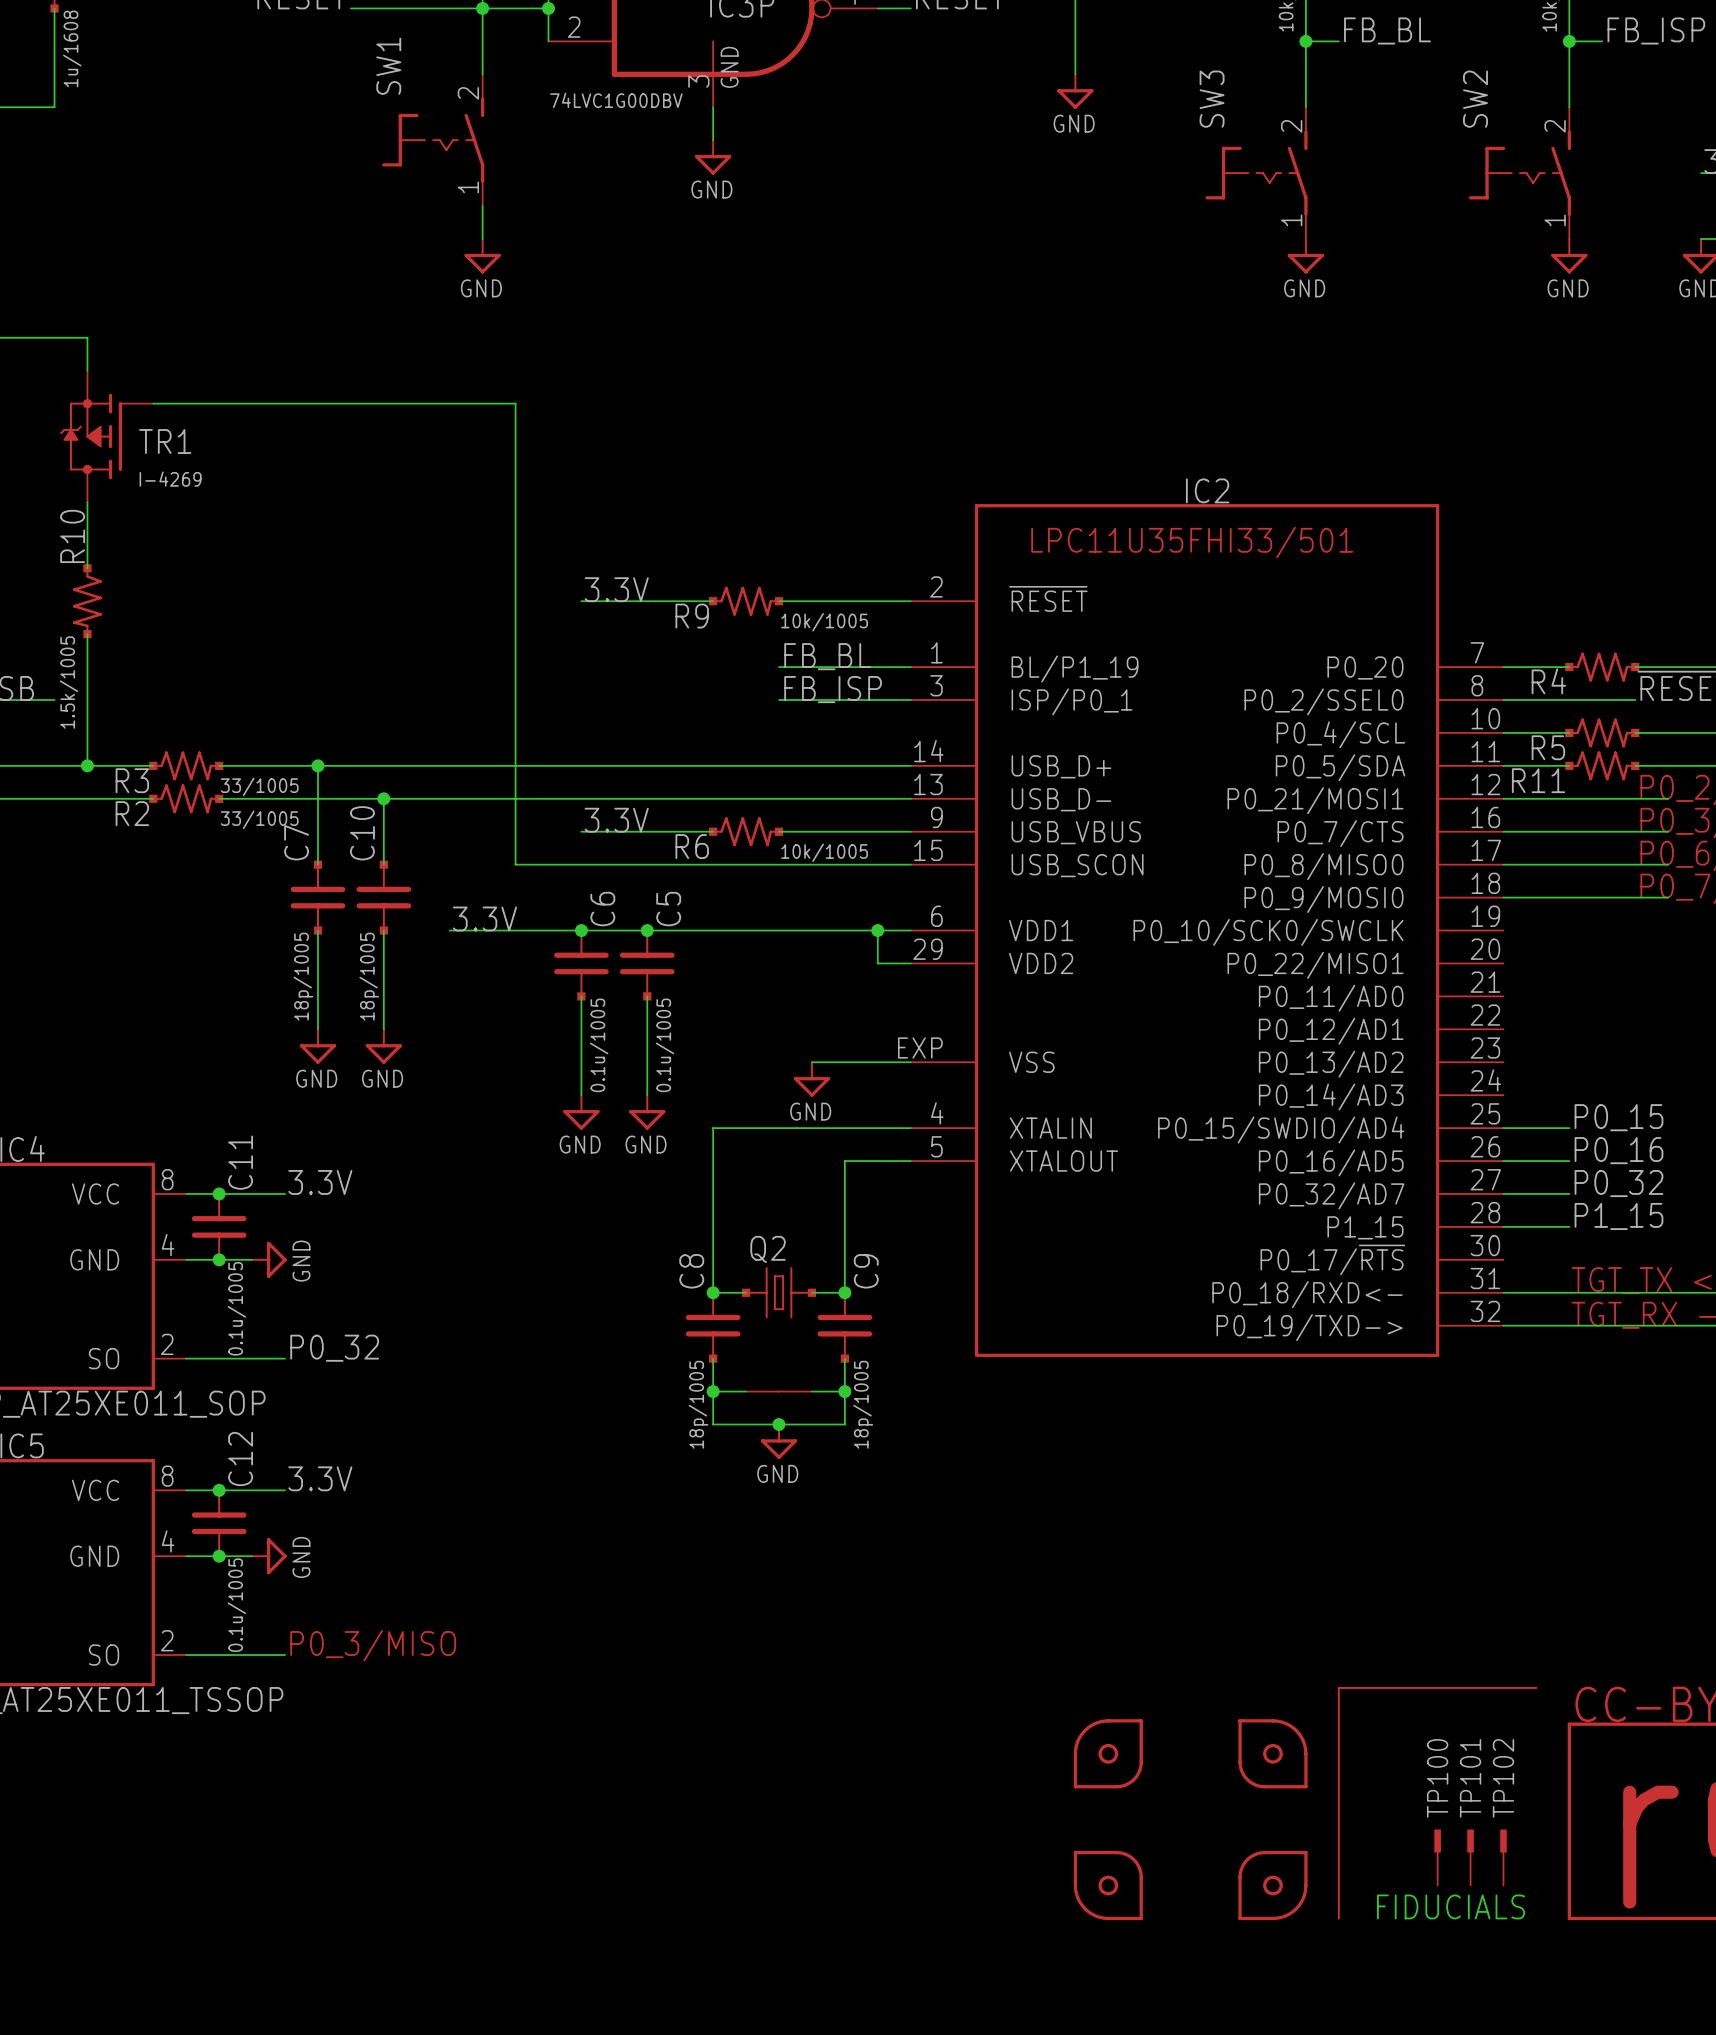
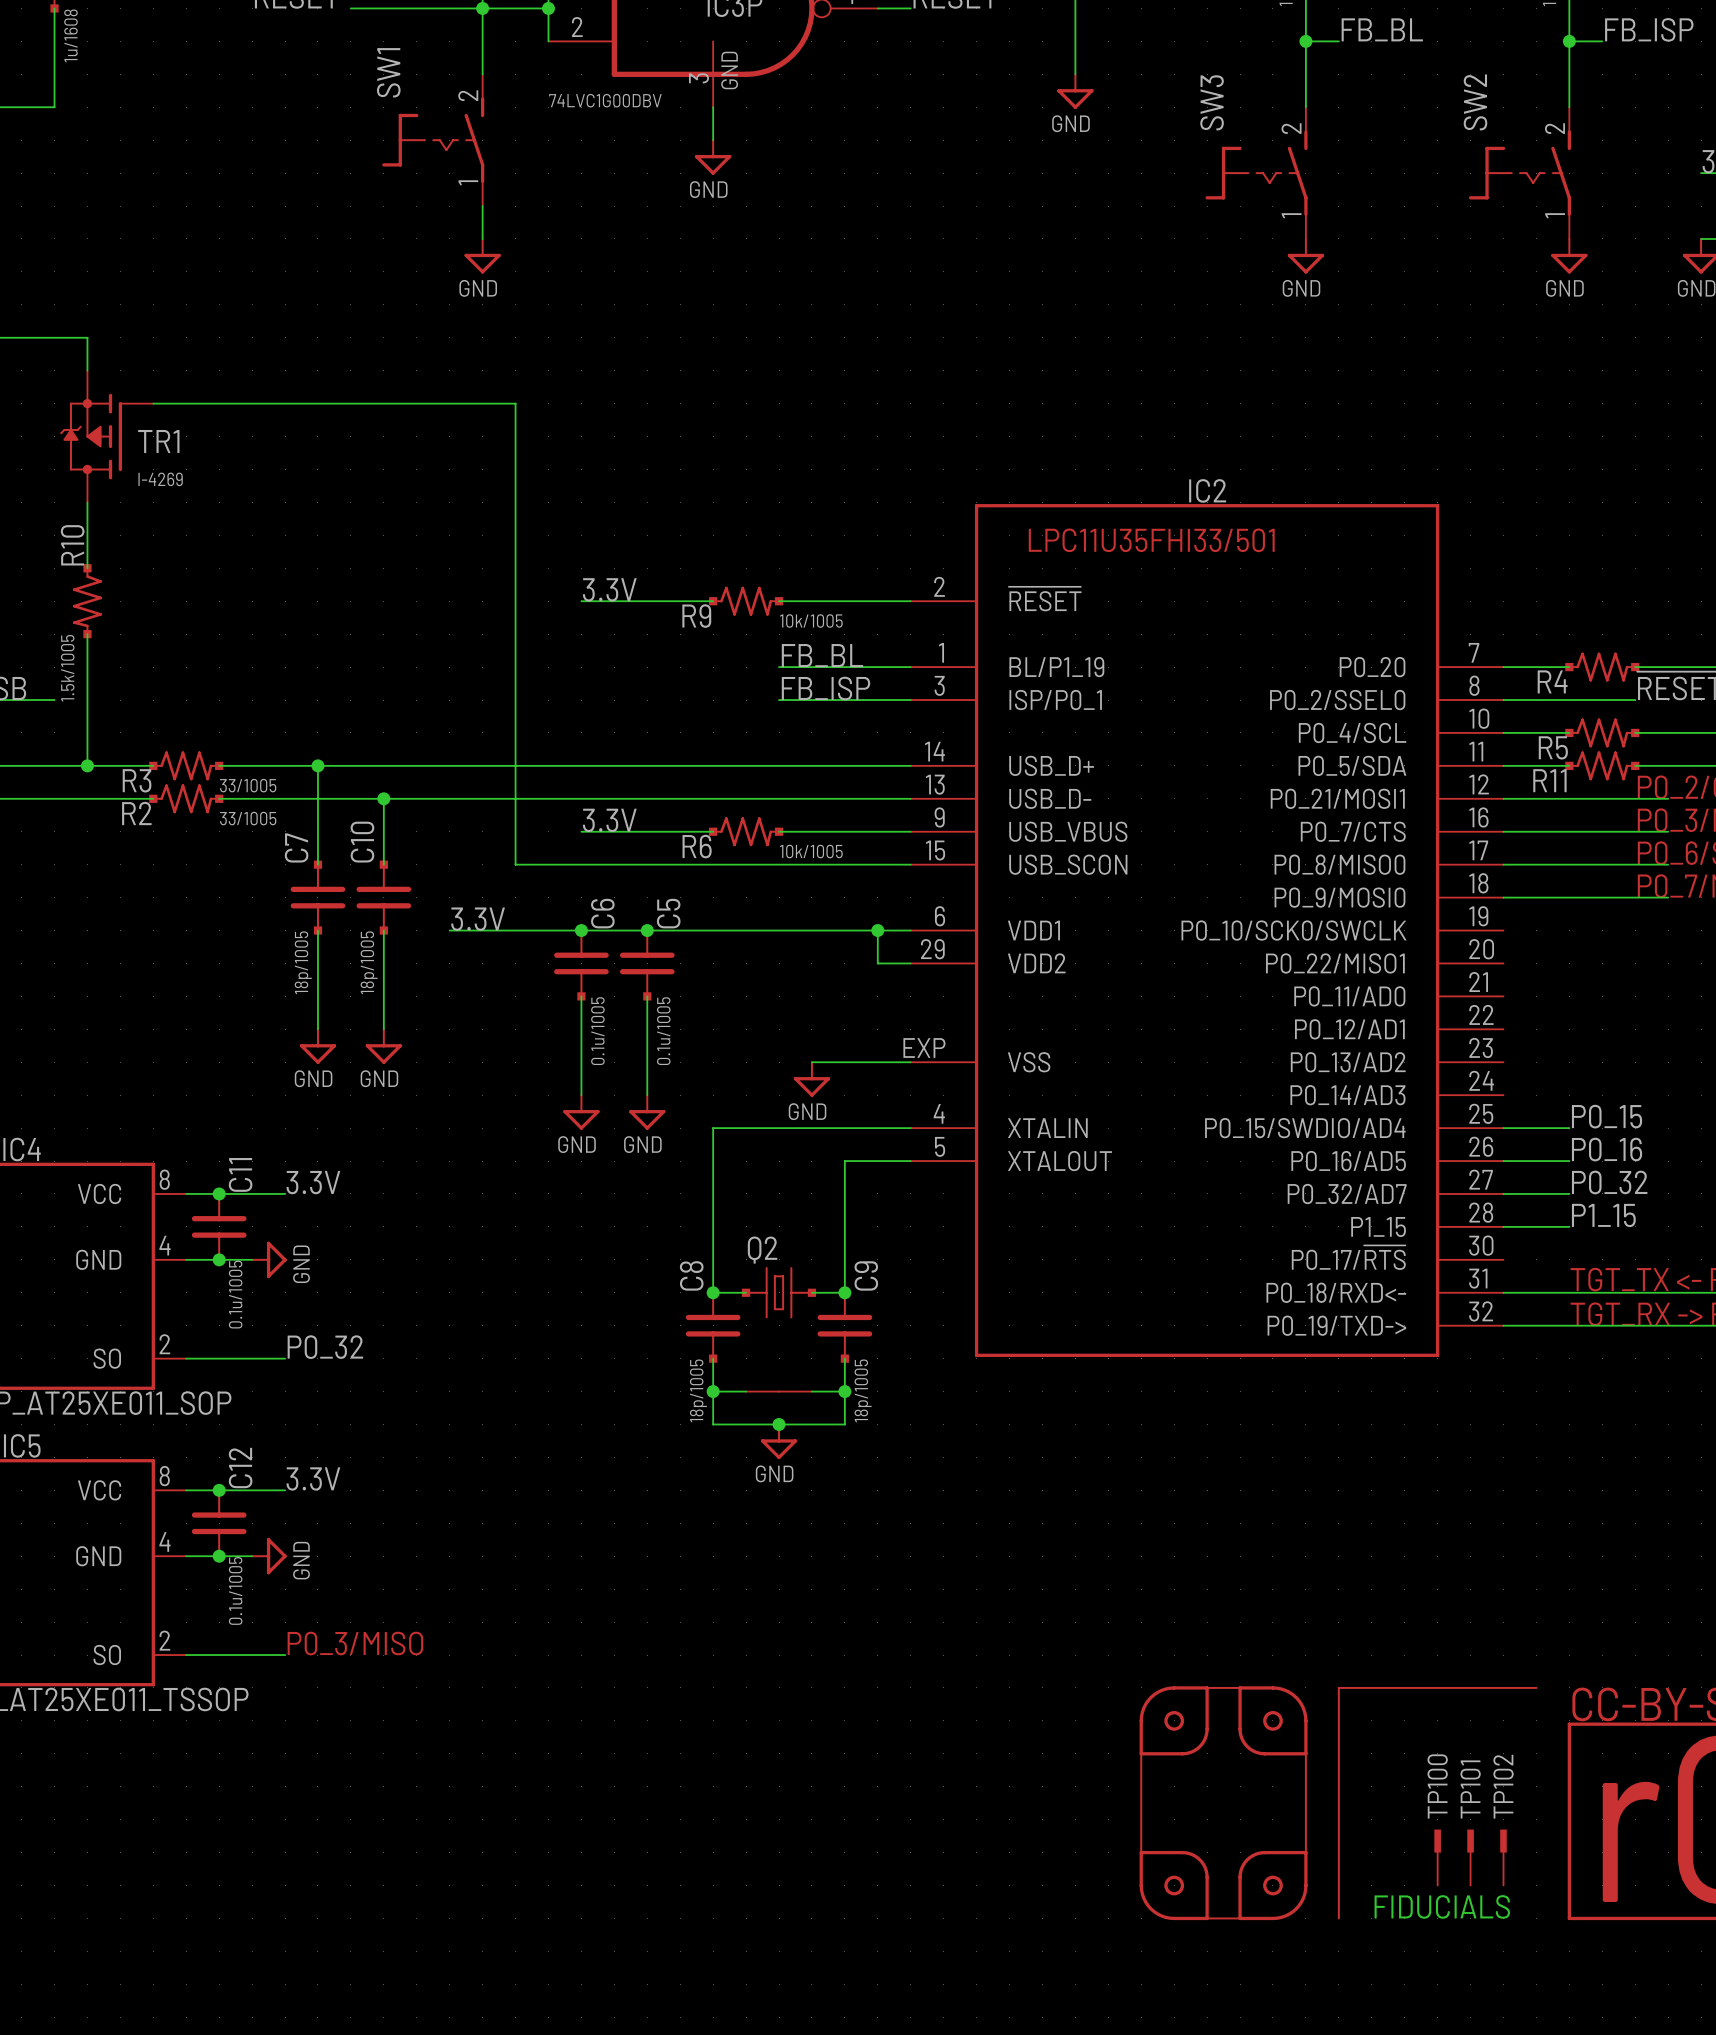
line: none -> (1207, 1687) (1240, 1687)
part: none -> (1174, 1720)
part: (1108, 1753) -> none
line: none -> (1141, 1753) (1141, 1852)
part position: (1272, 1753) -> (1272, 1720)
line: none -> (1305, 1753) (1305, 1852)
part position: (1108, 1885) -> (1174, 1885)
line: none -> (1207, 1918) (1240, 1918)

